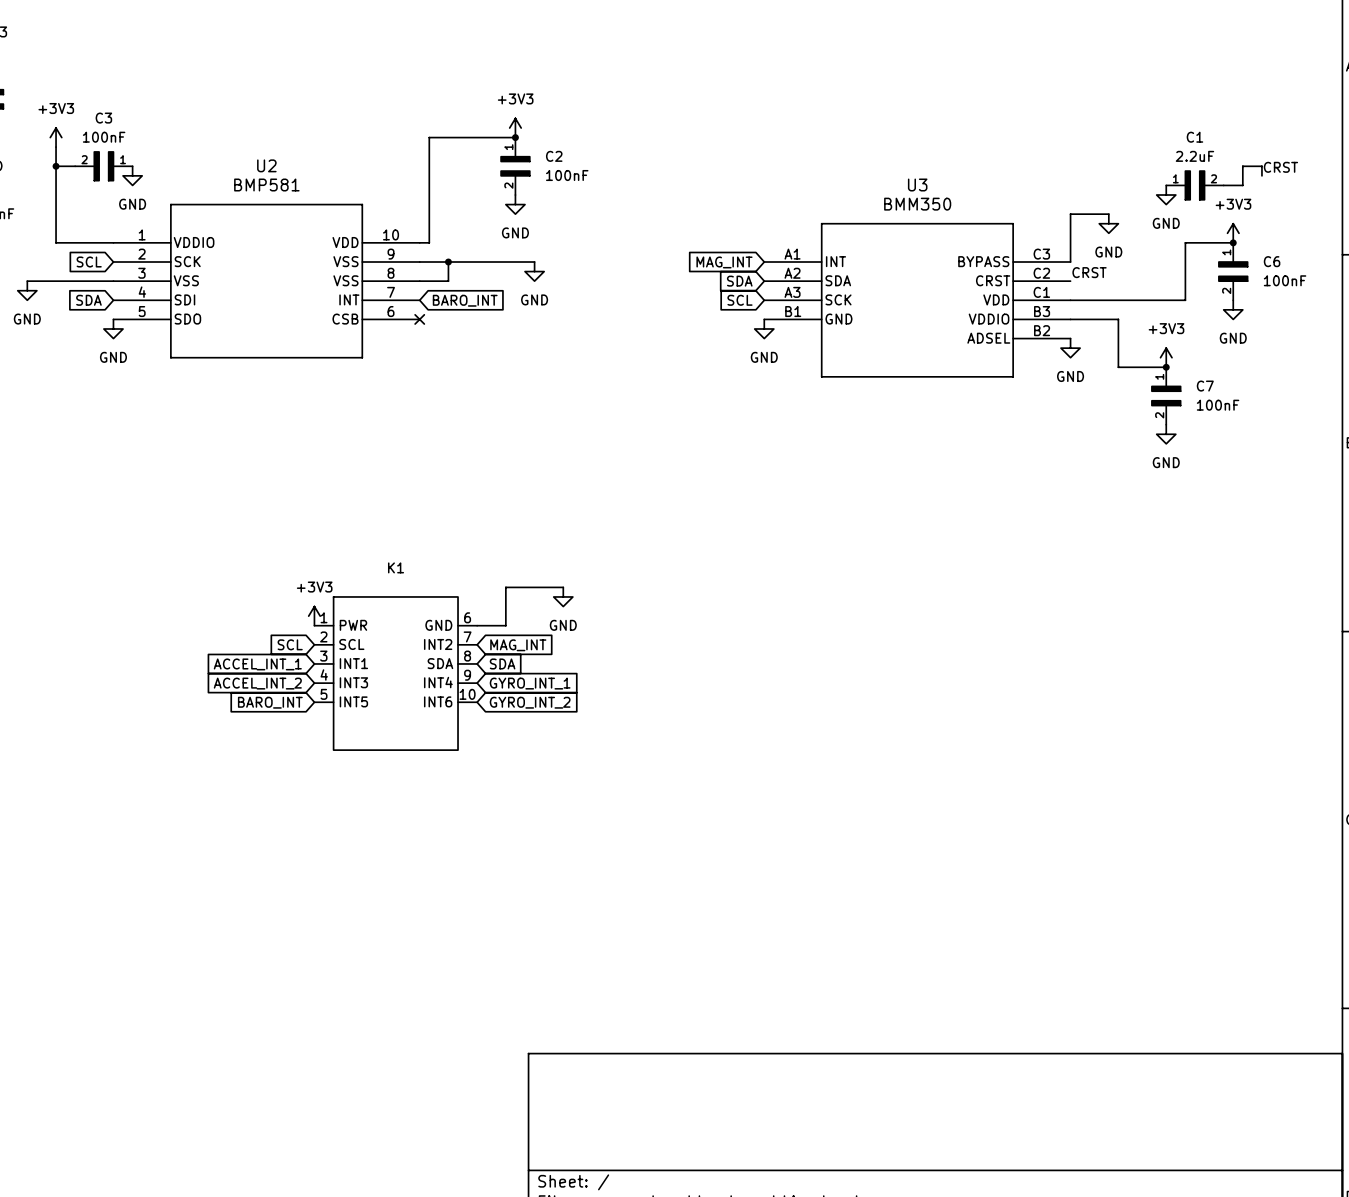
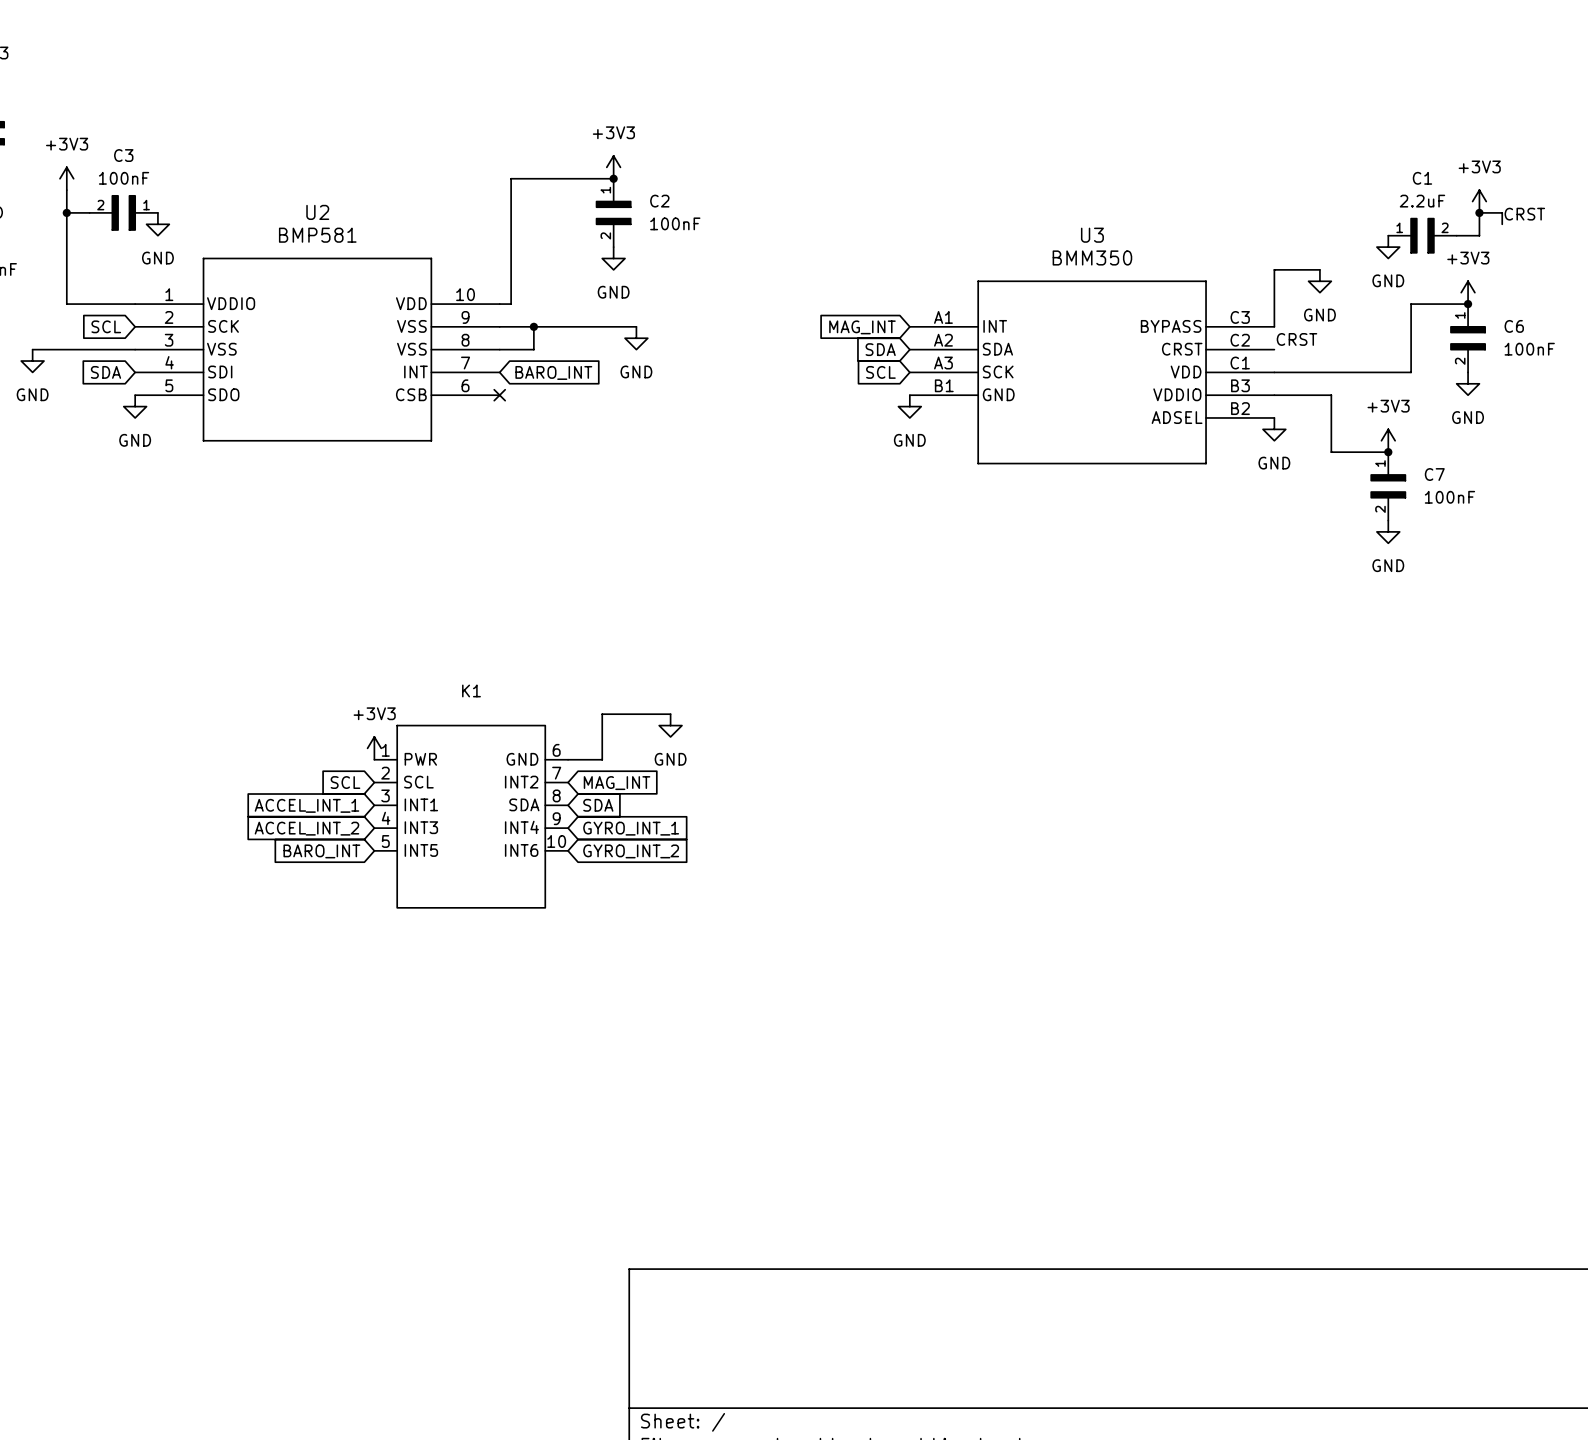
power symbol: none -> +3V3 (1479, 201)
junction: none -> (1479, 212)

